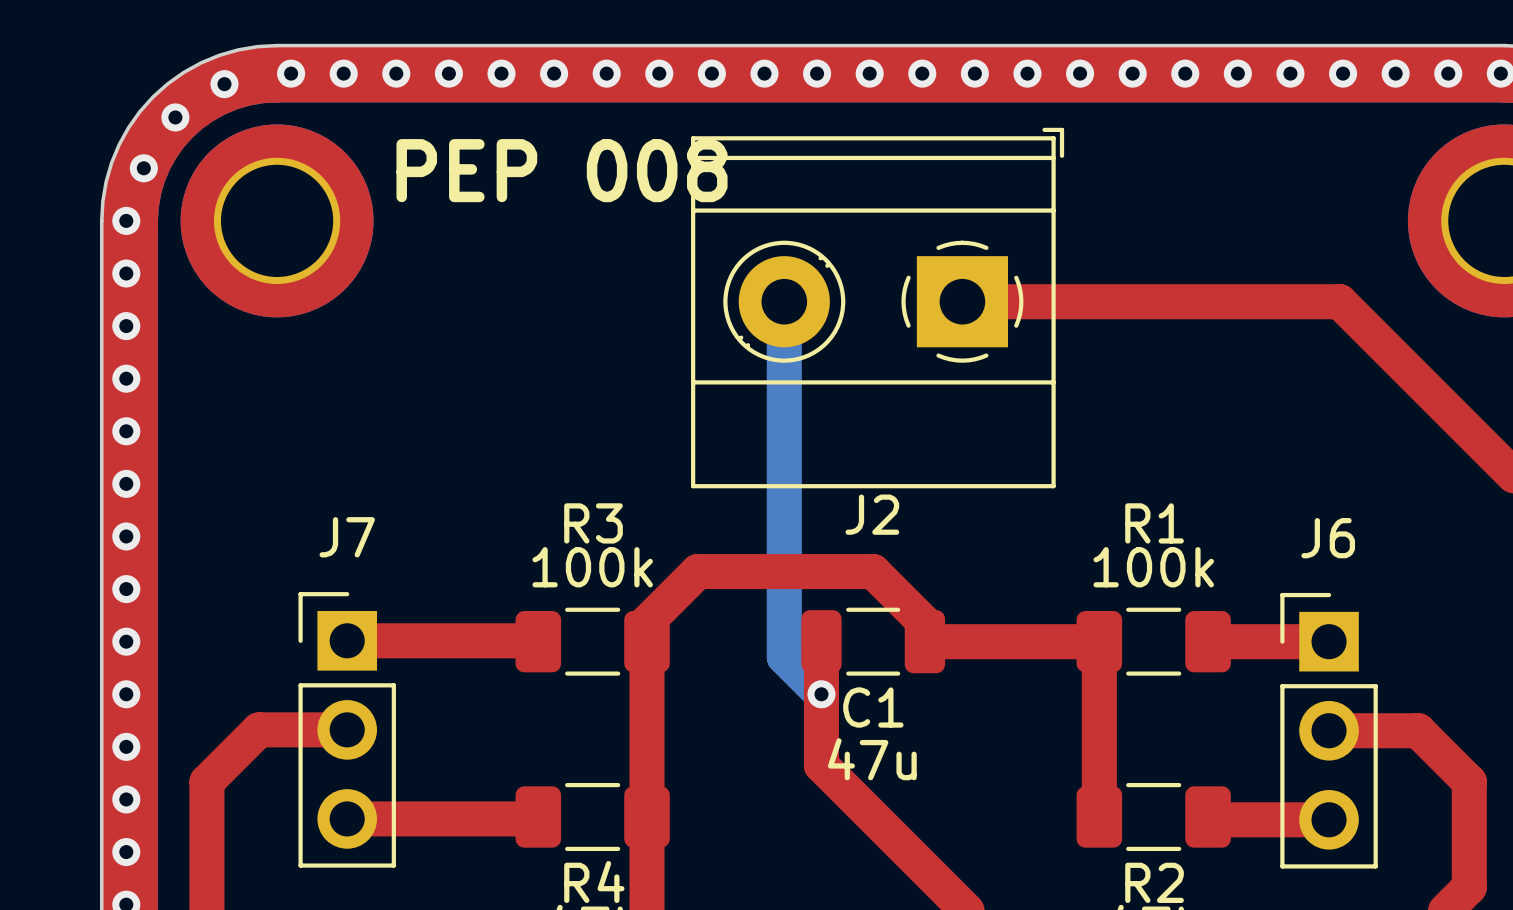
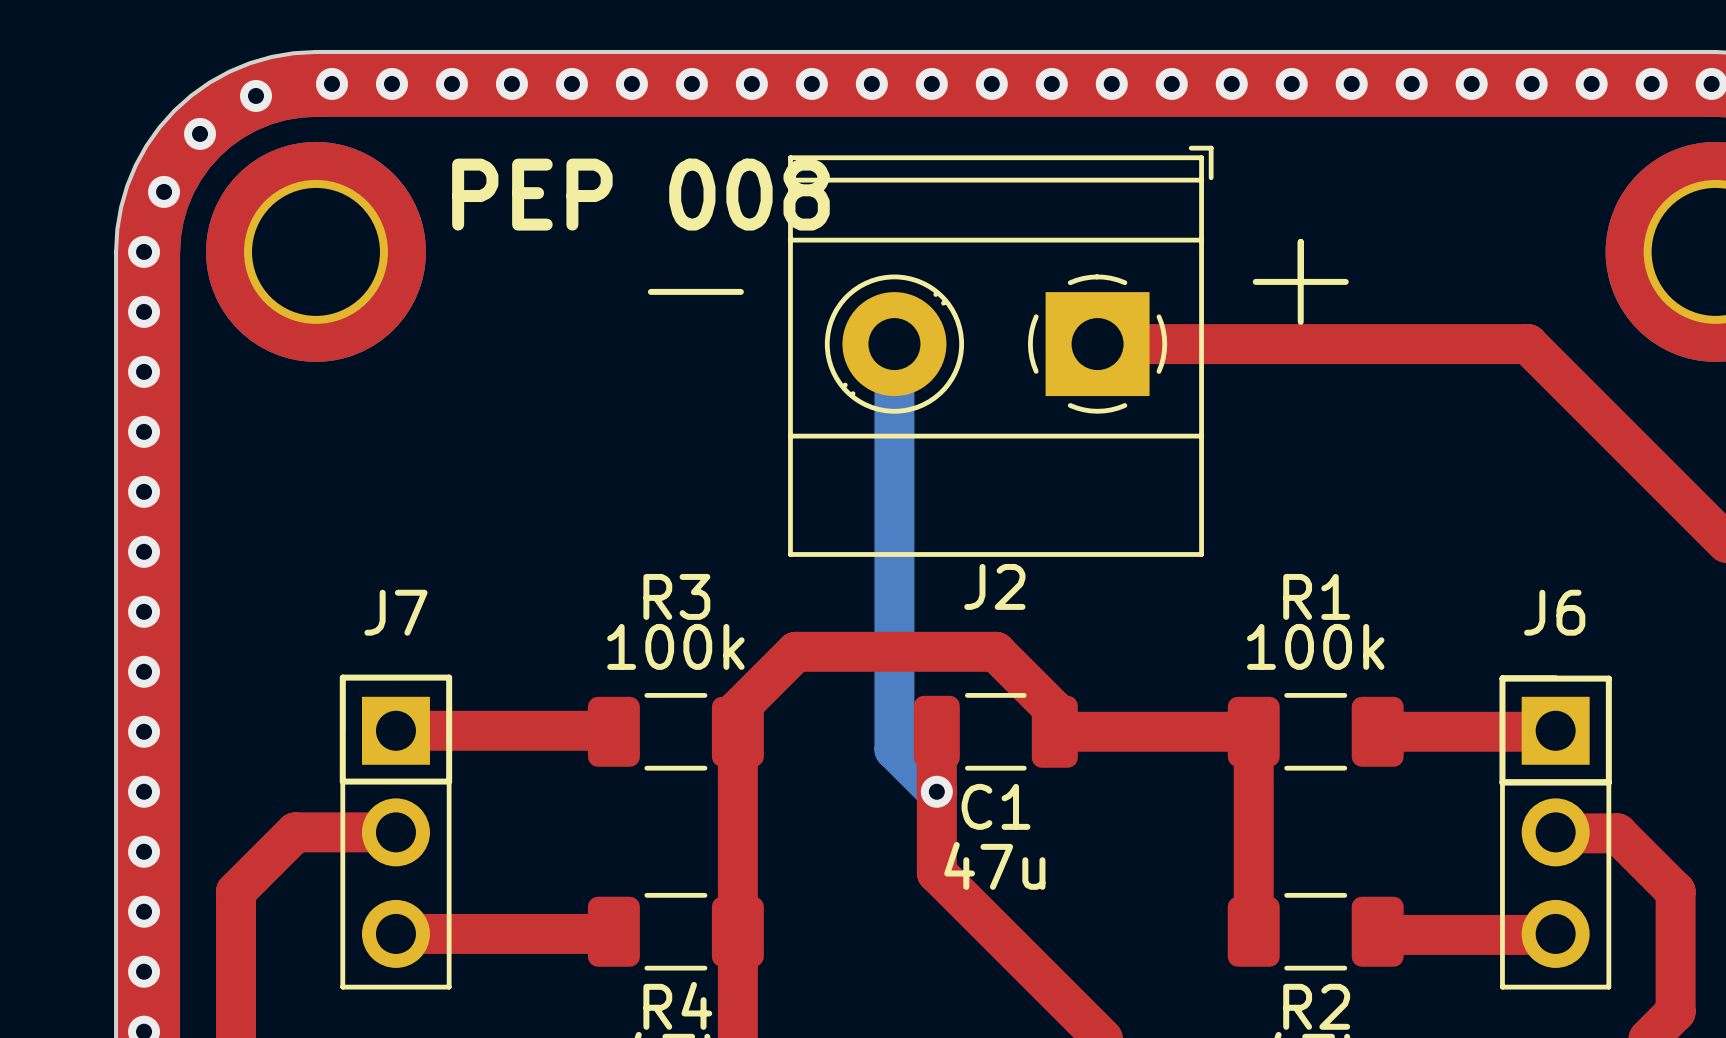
line: none -> (1300, 241) (1300, 321)
line: none -> (1255, 281) (1345, 281)
line: none -> (650, 291) (740, 291)
line: none -> (342, 677) (449, 677) (449, 781) (342, 781) (342, 677)
line: none -> (1502, 678) (1608, 678) (1608, 782) (1502, 782) (1502, 678)
J6 position: (1329, 730) -> (1555, 832)

